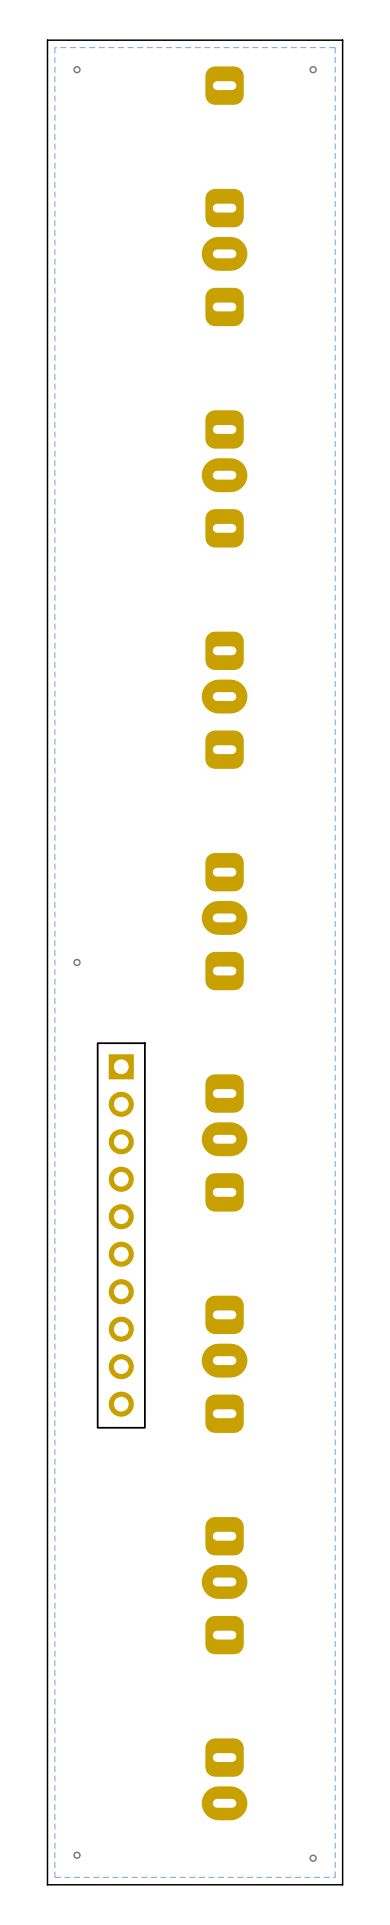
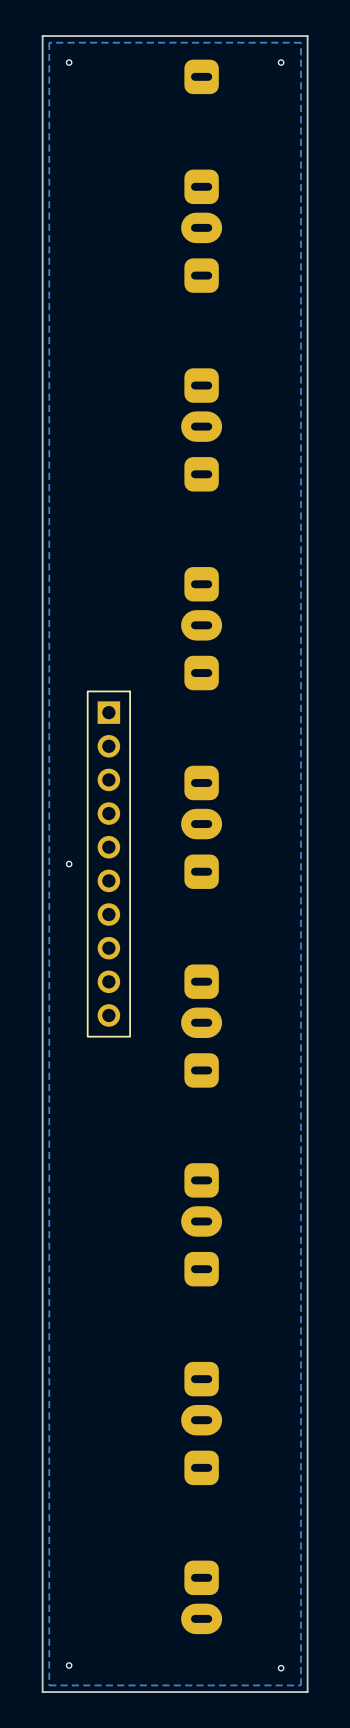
part position: (121, 1235) -> (108, 864)

